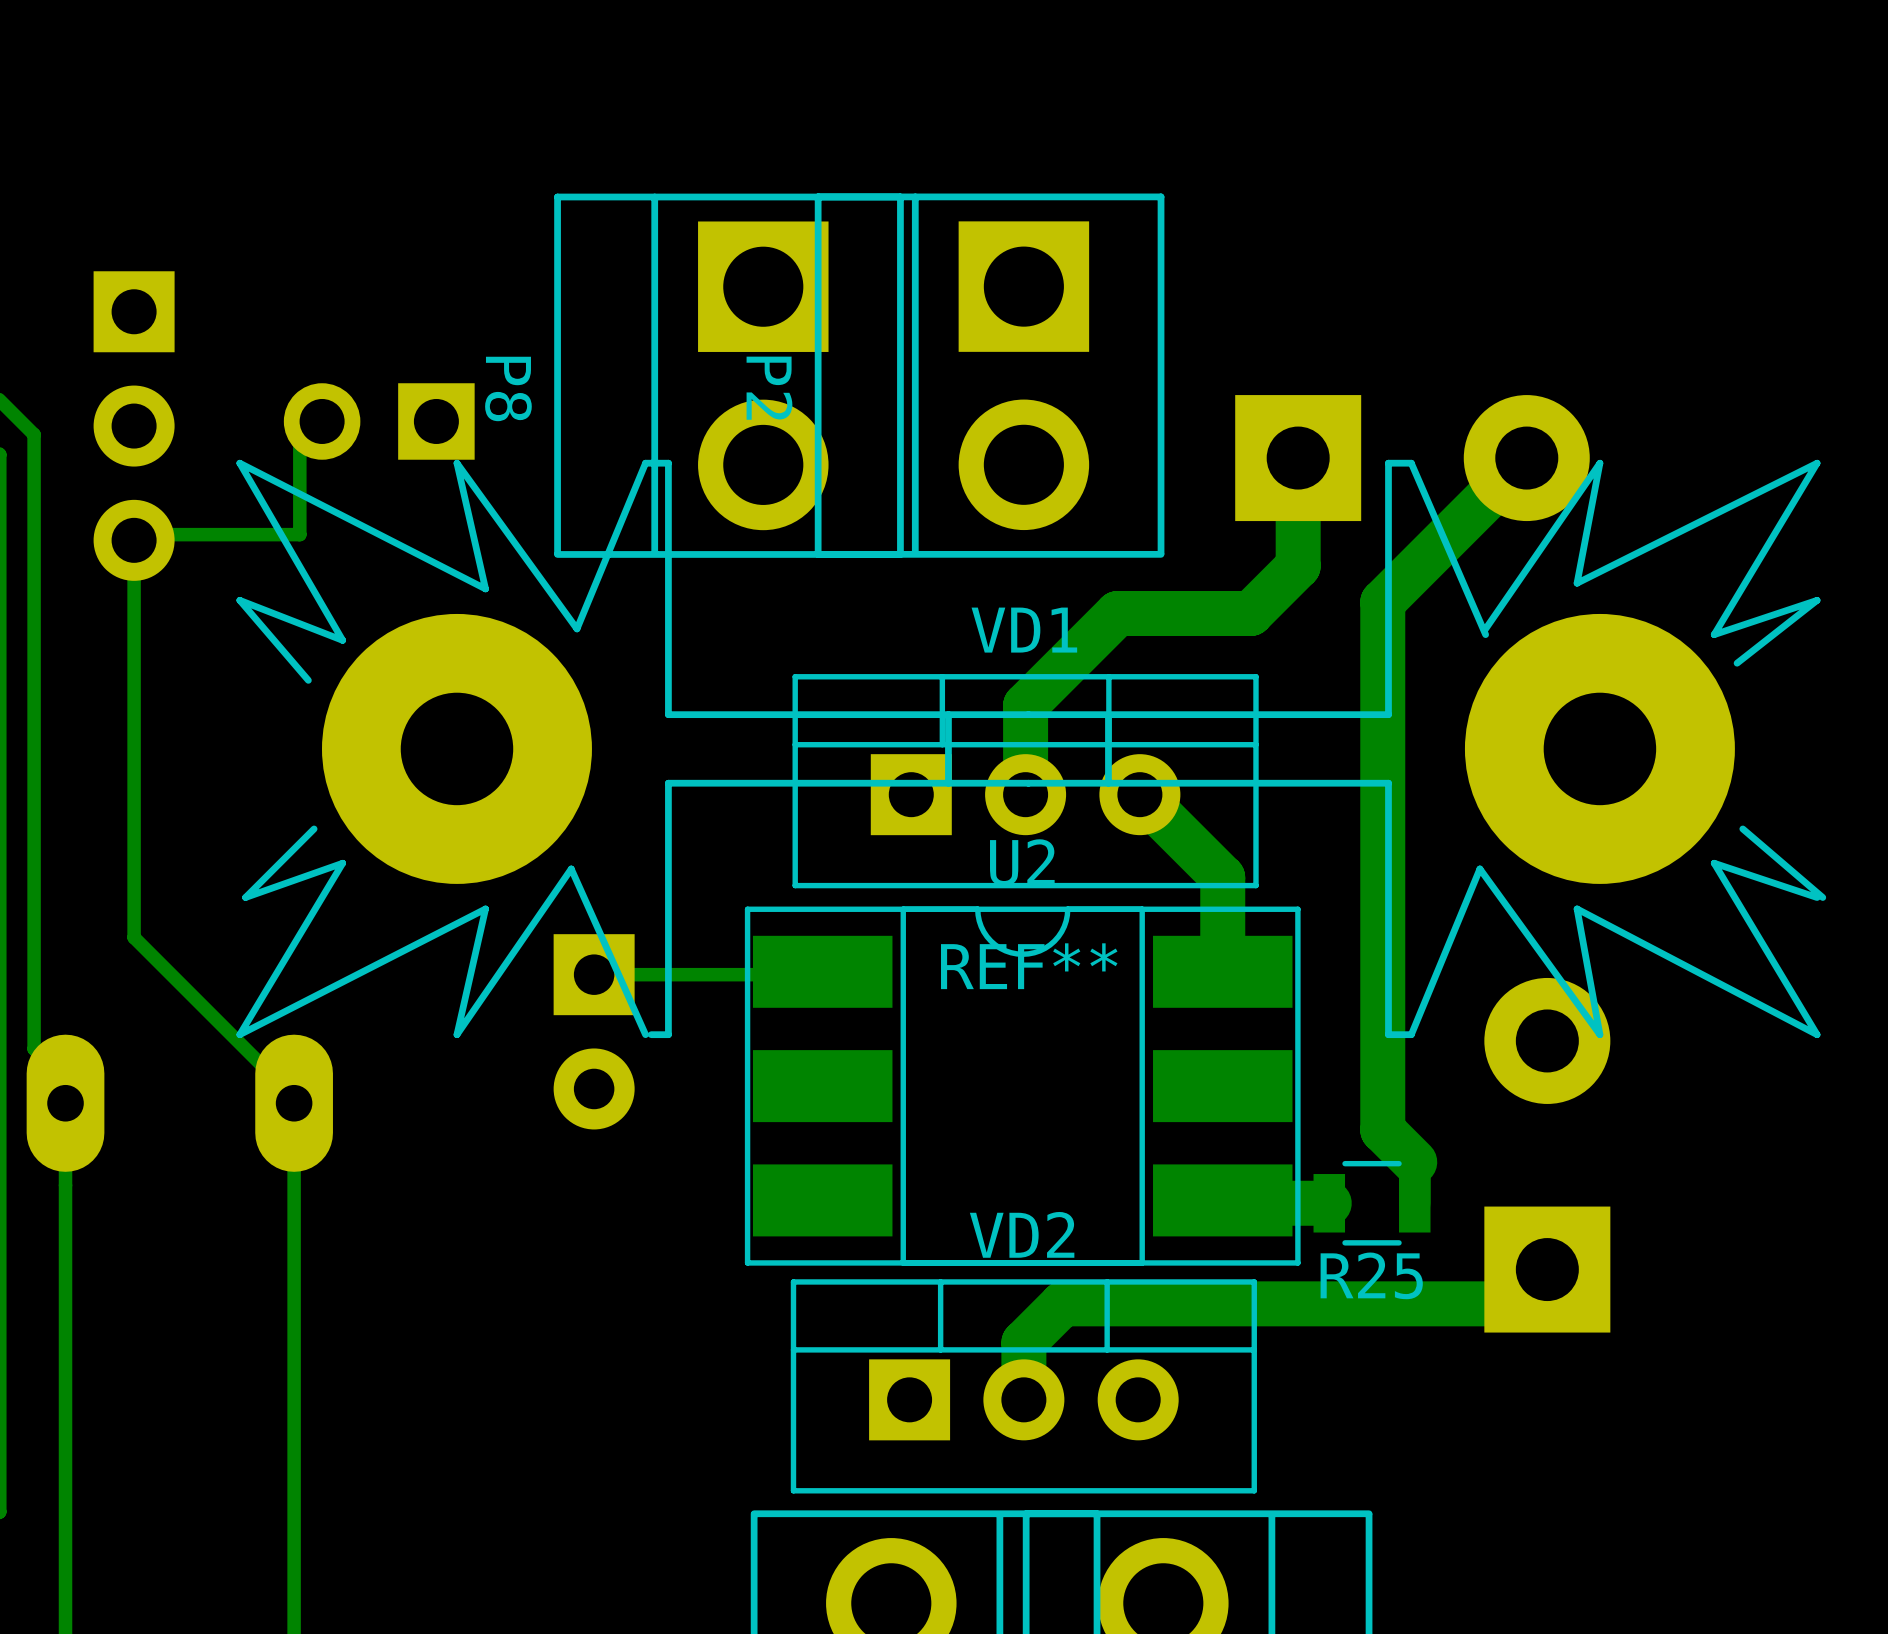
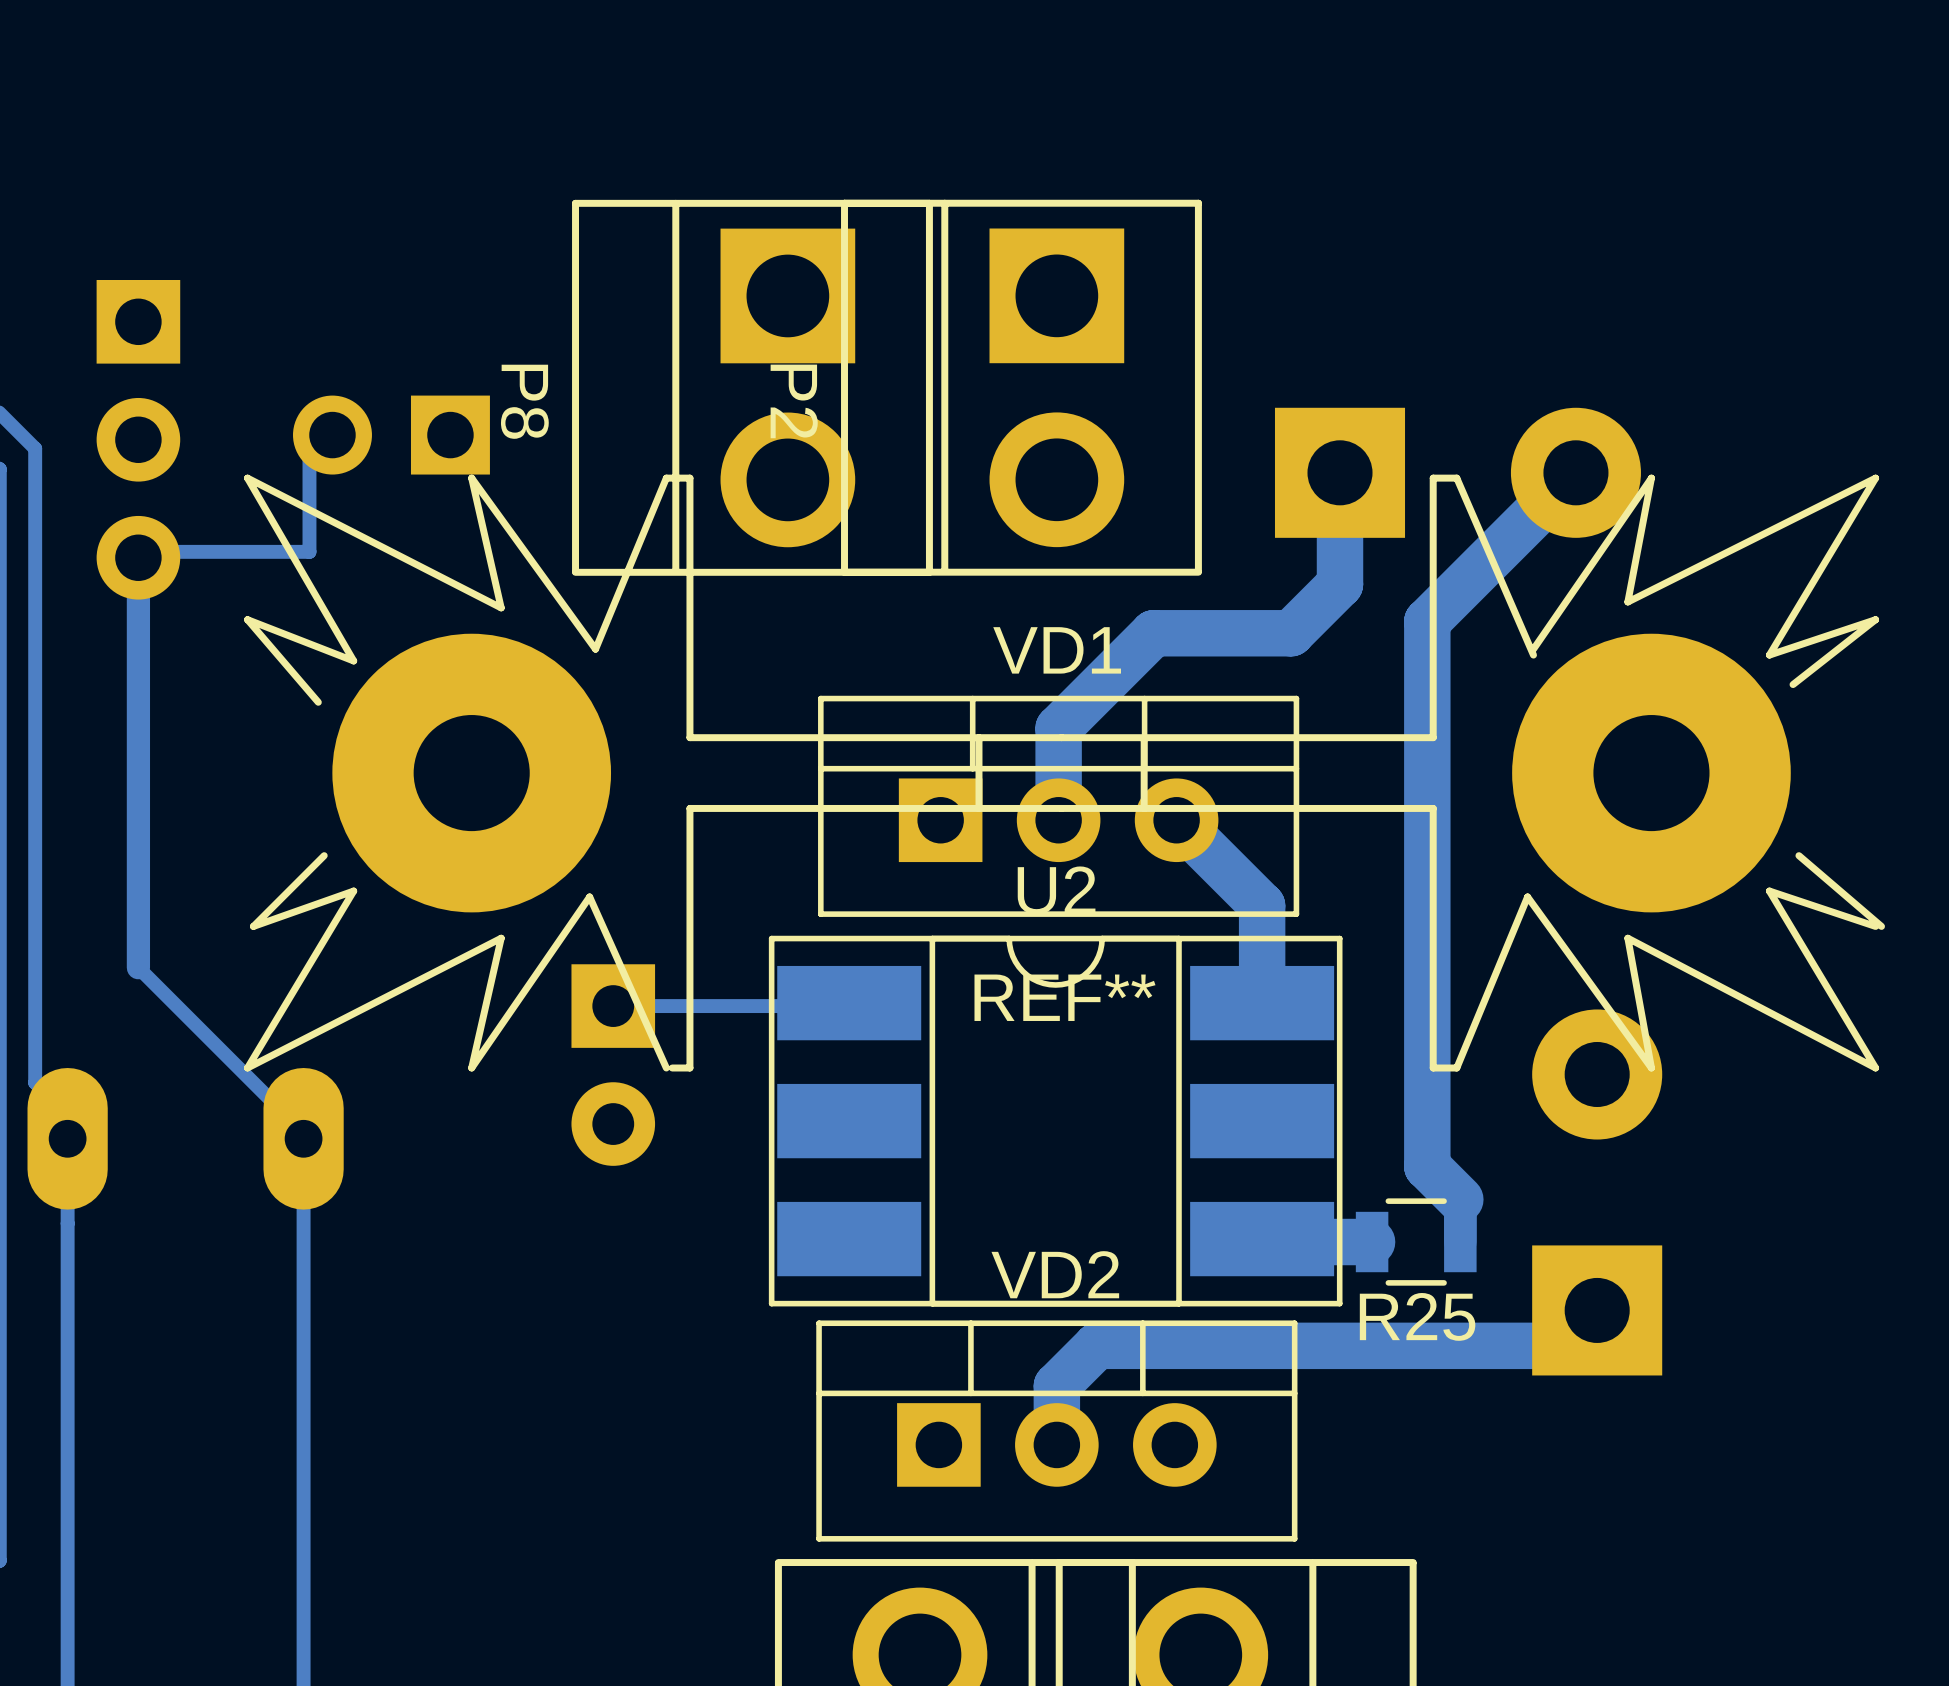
track width: thin (134, 540) (134, 937) -> thick (138, 557) (138, 967)

